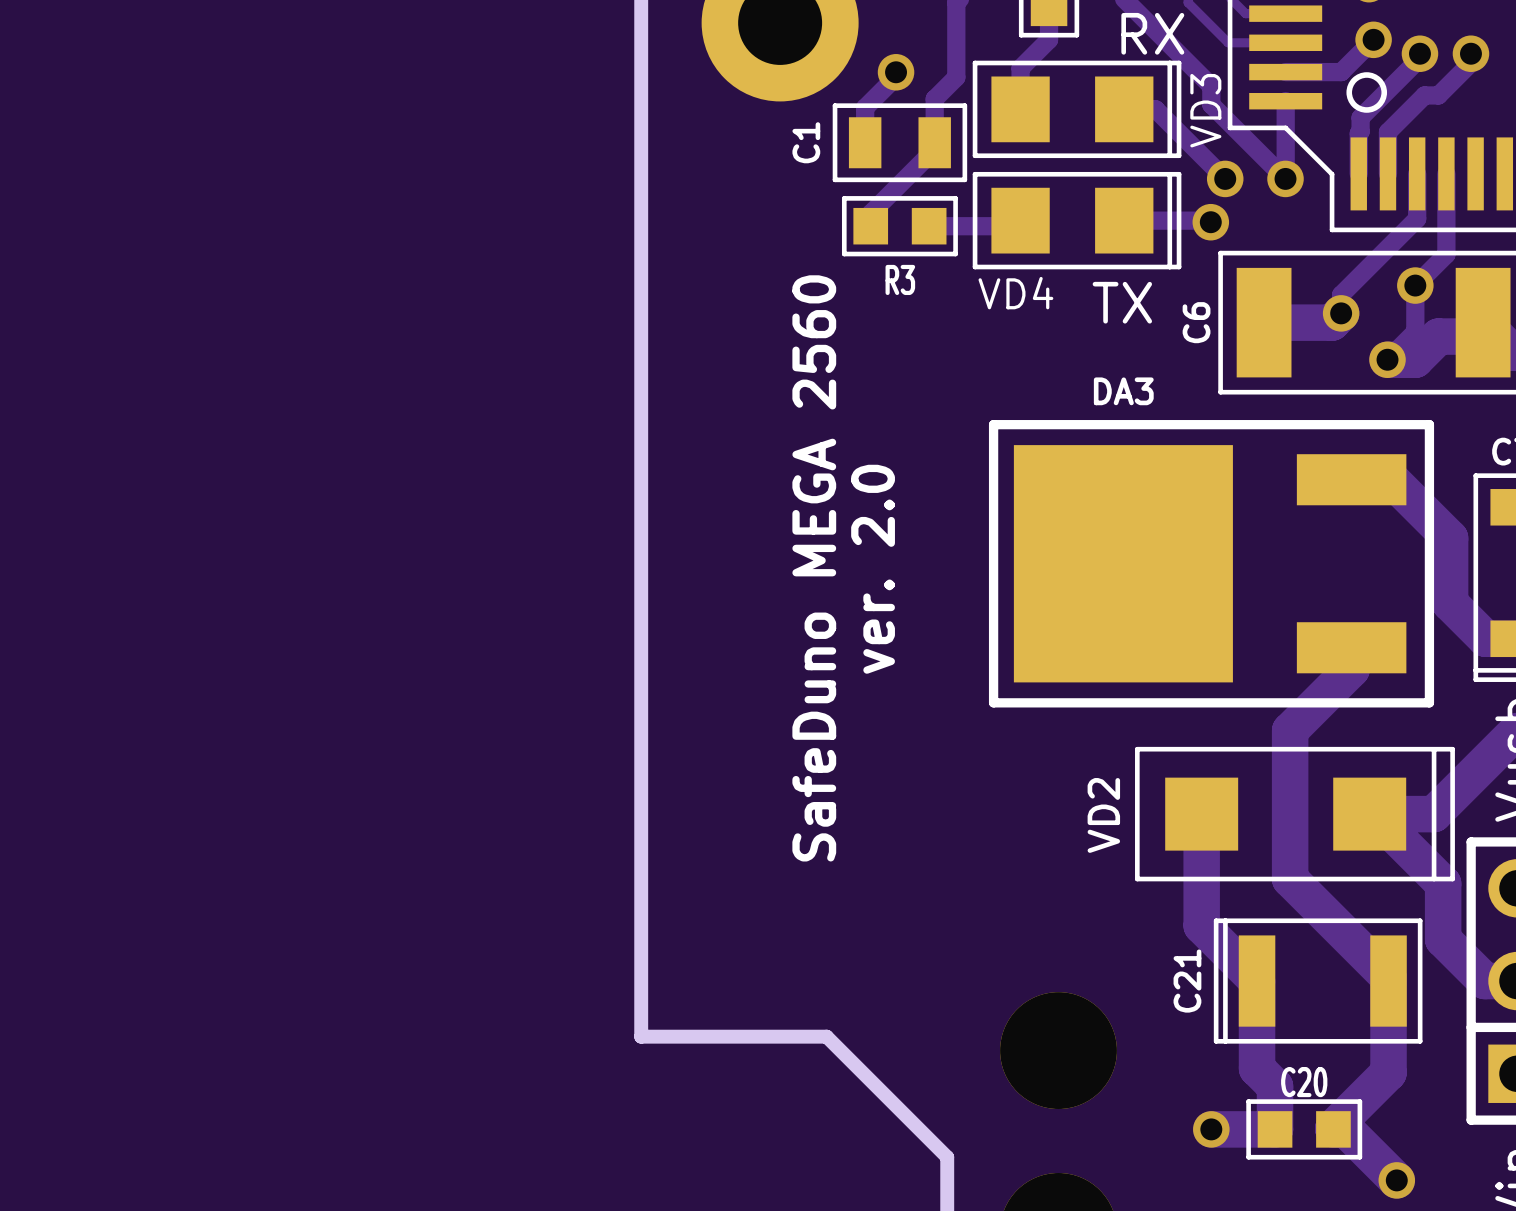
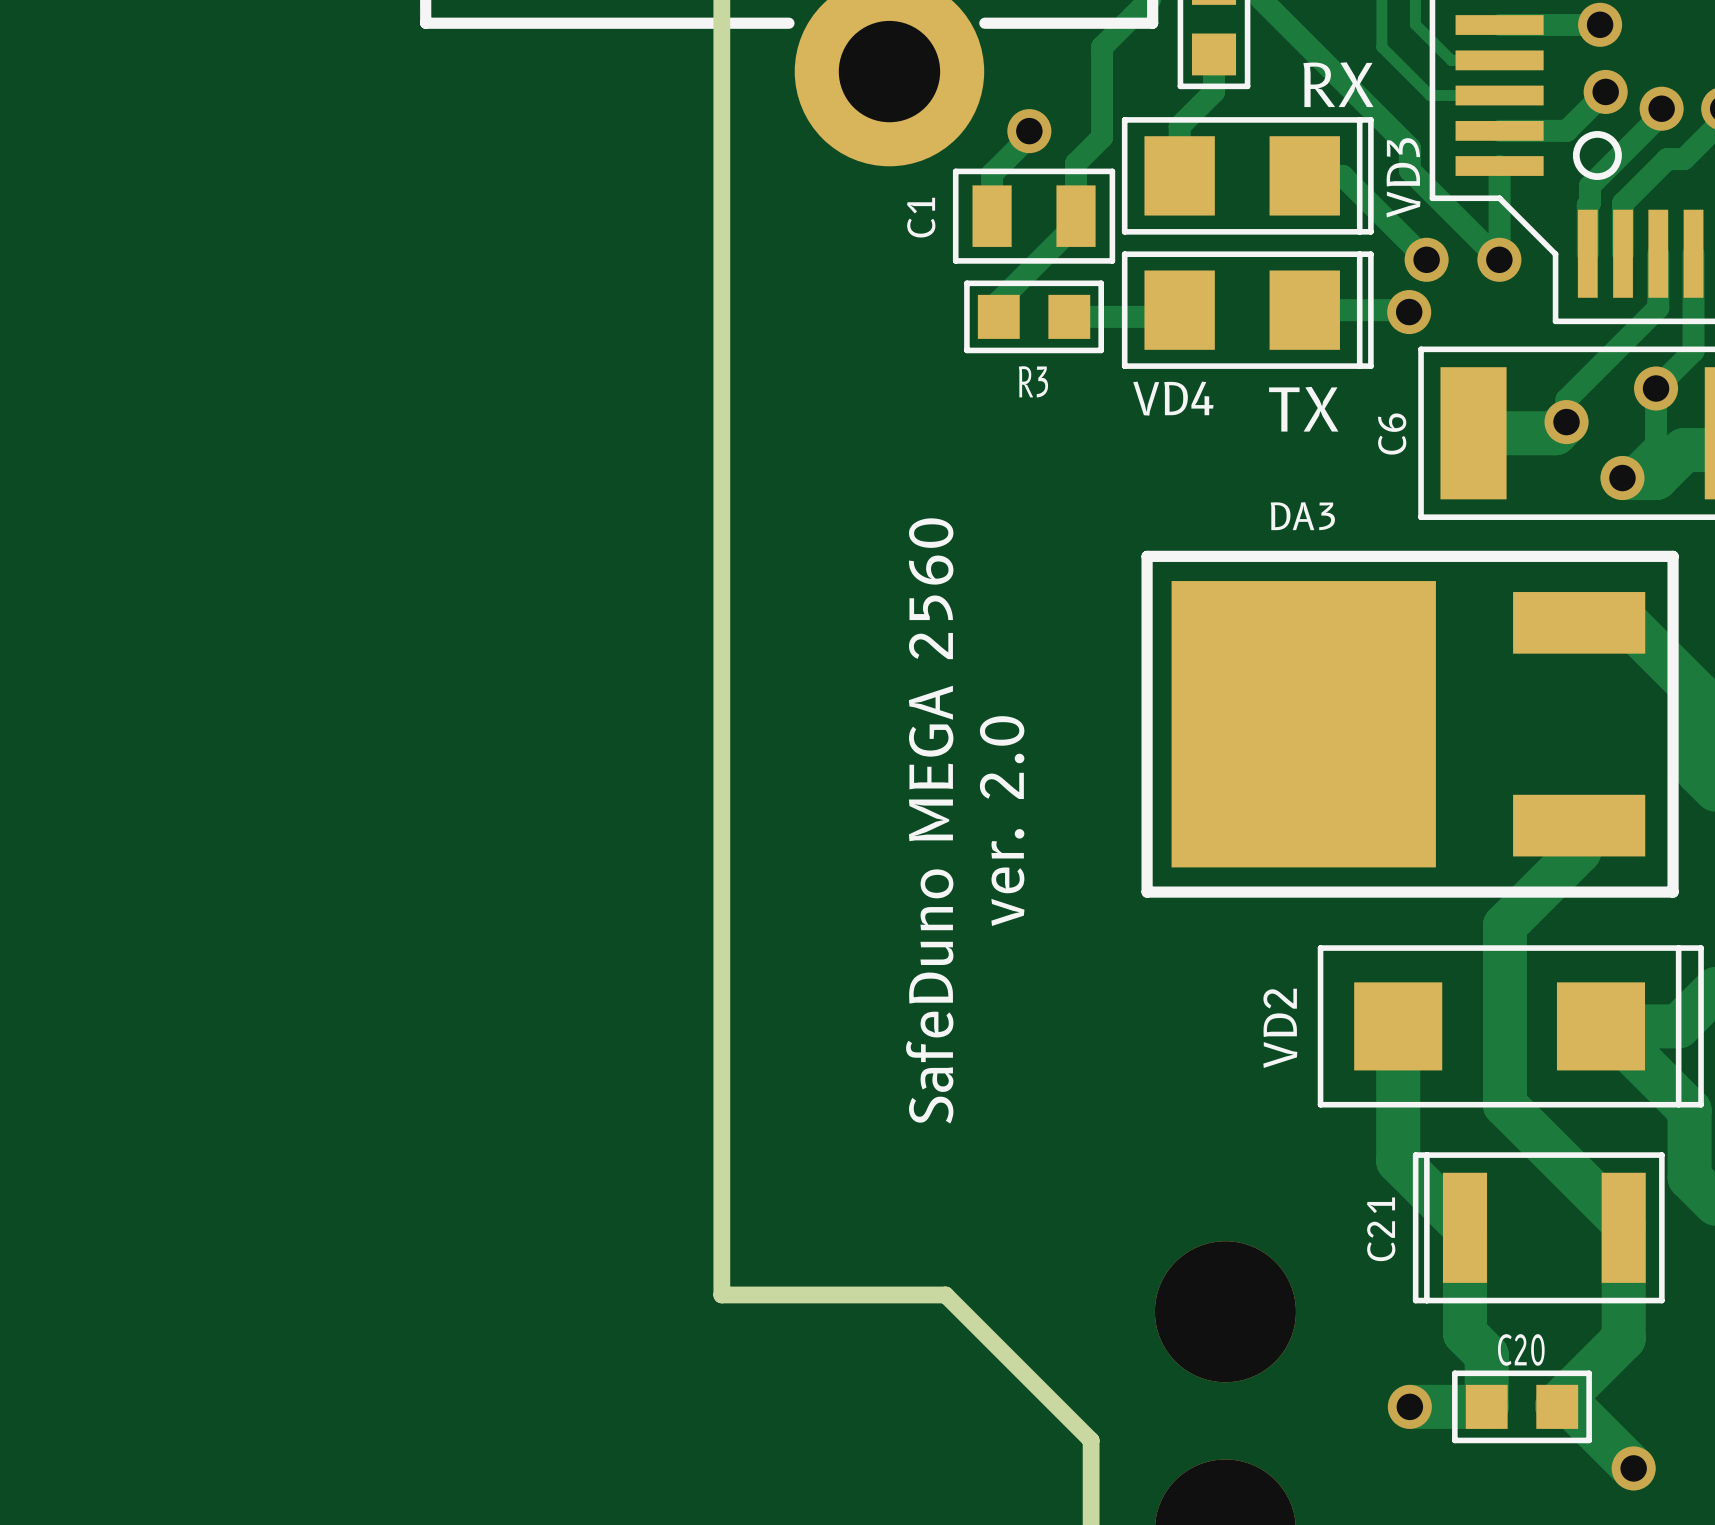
text position: SafeDuno MEGA 2560 (814, 568) -> SafeDuno MEGA 2560 (929, 820)
text position: ver. 2.0 (873, 569) -> ver. 2.0 (1002, 821)

